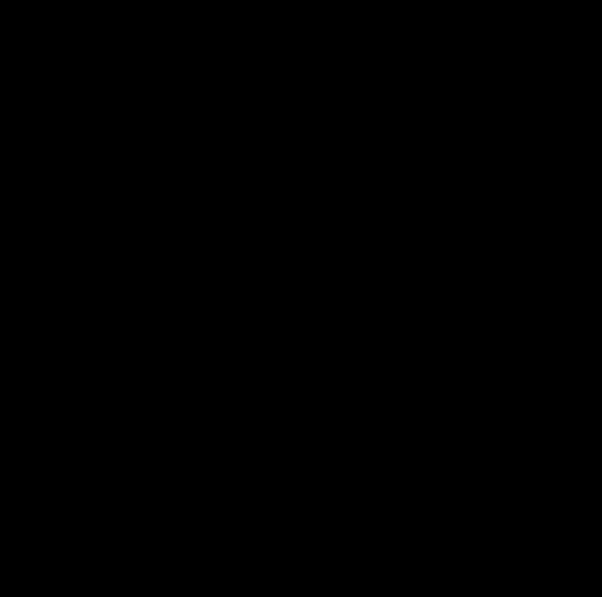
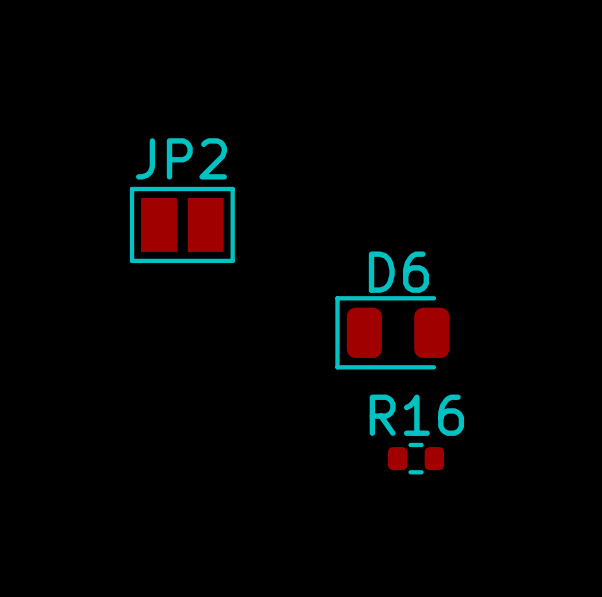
JP2: none -> (182, 224)
D6: none -> (392, 332)
R16: none -> (416, 458)

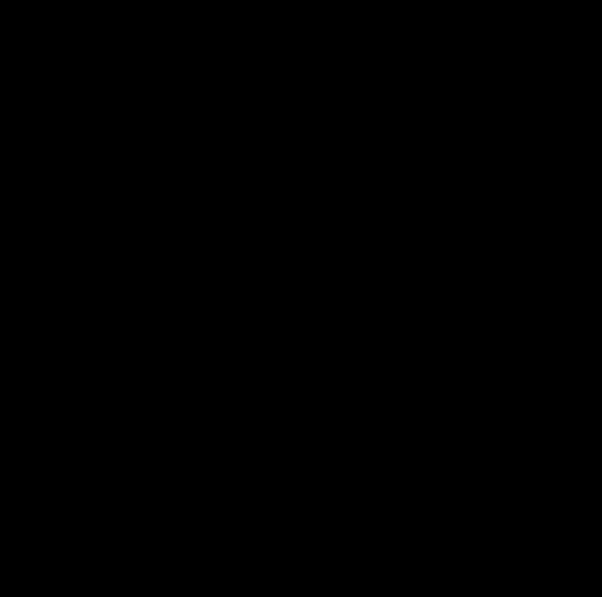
JP2: (182, 224) -> none
D6: (392, 332) -> none
R16: (416, 458) -> none

